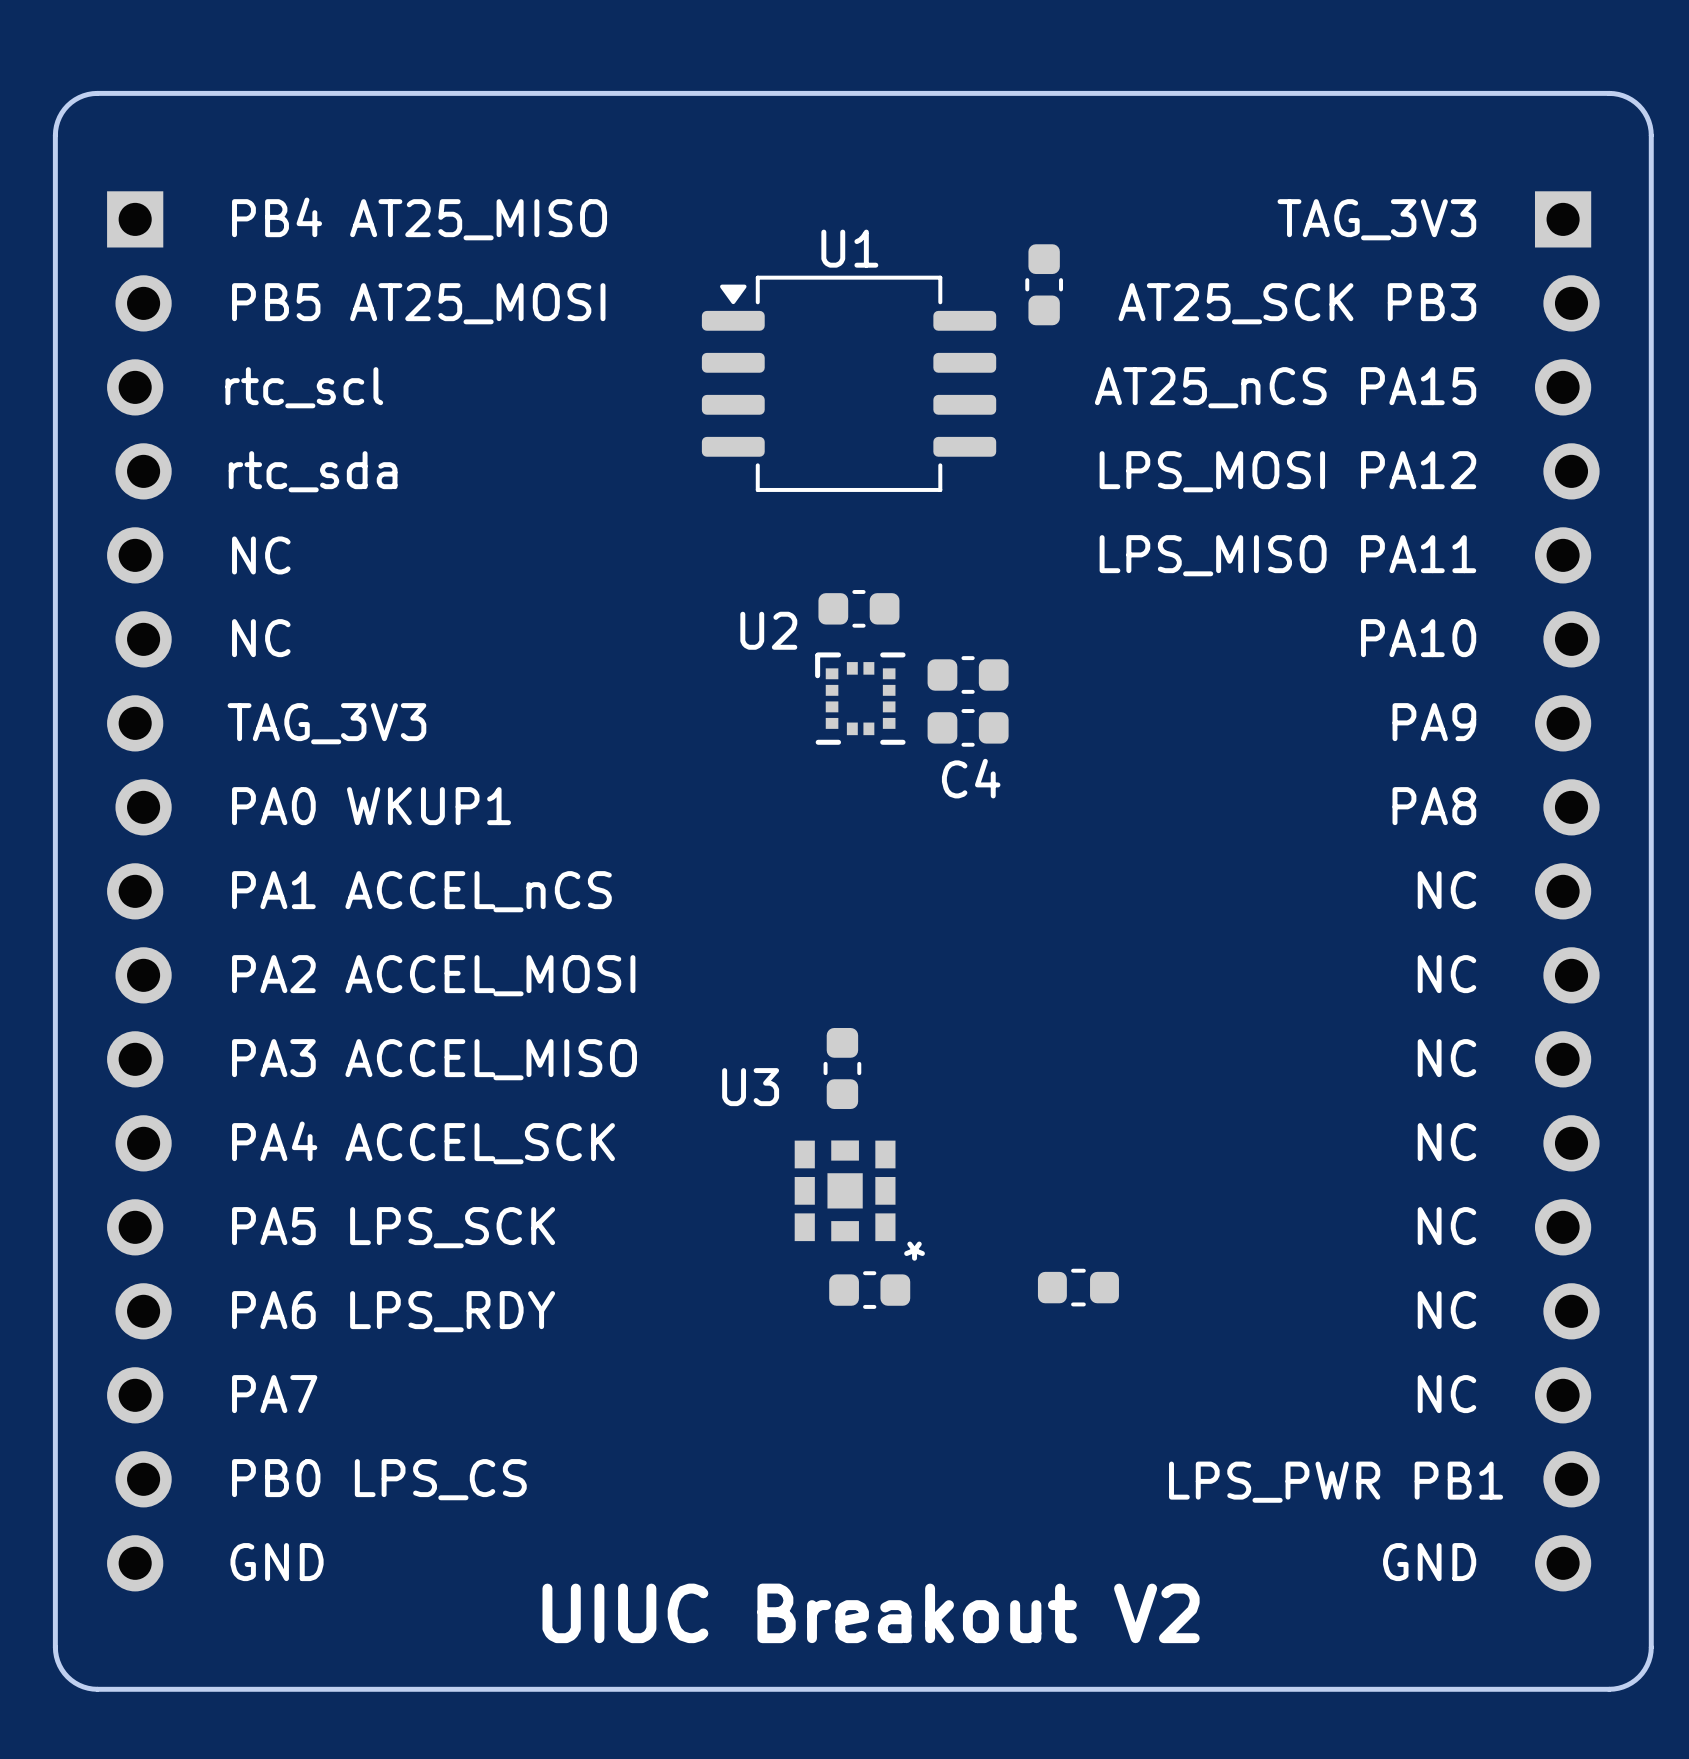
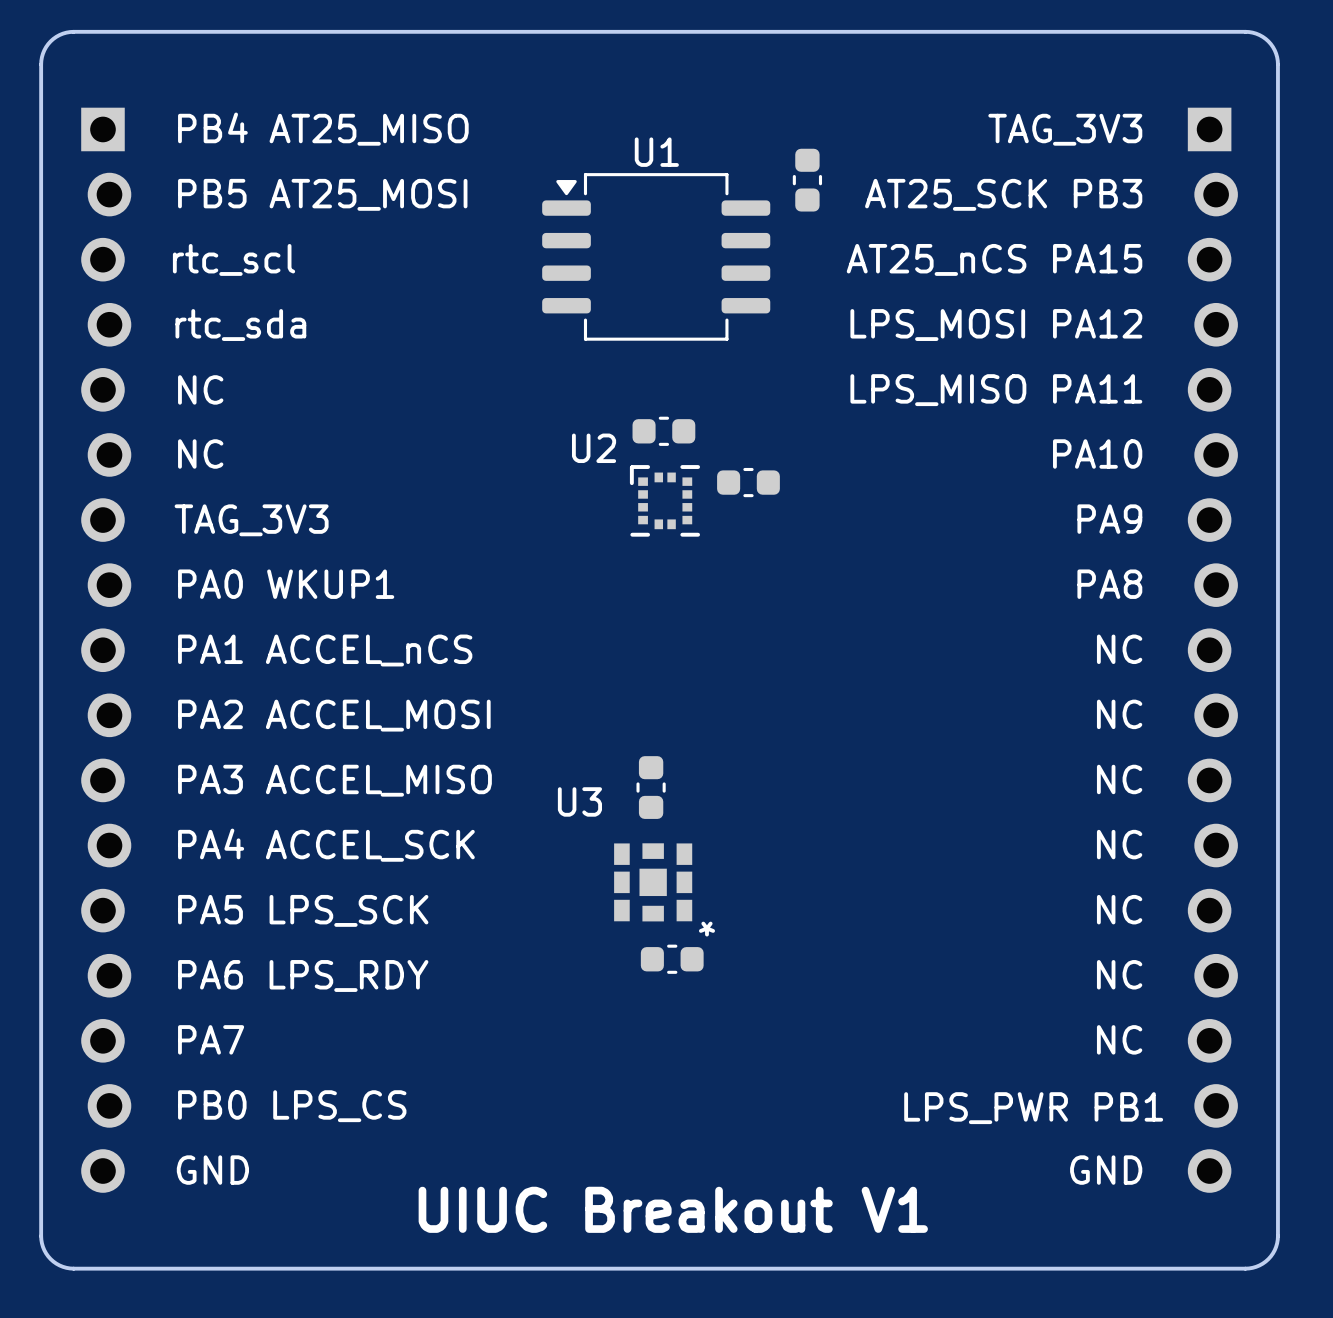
C4: (968, 727) -> none
part: (1078, 1287) -> none
text: UIUC Breakout V2 (871, 1613) -> UIUC Breakout V1 (673, 1209)

